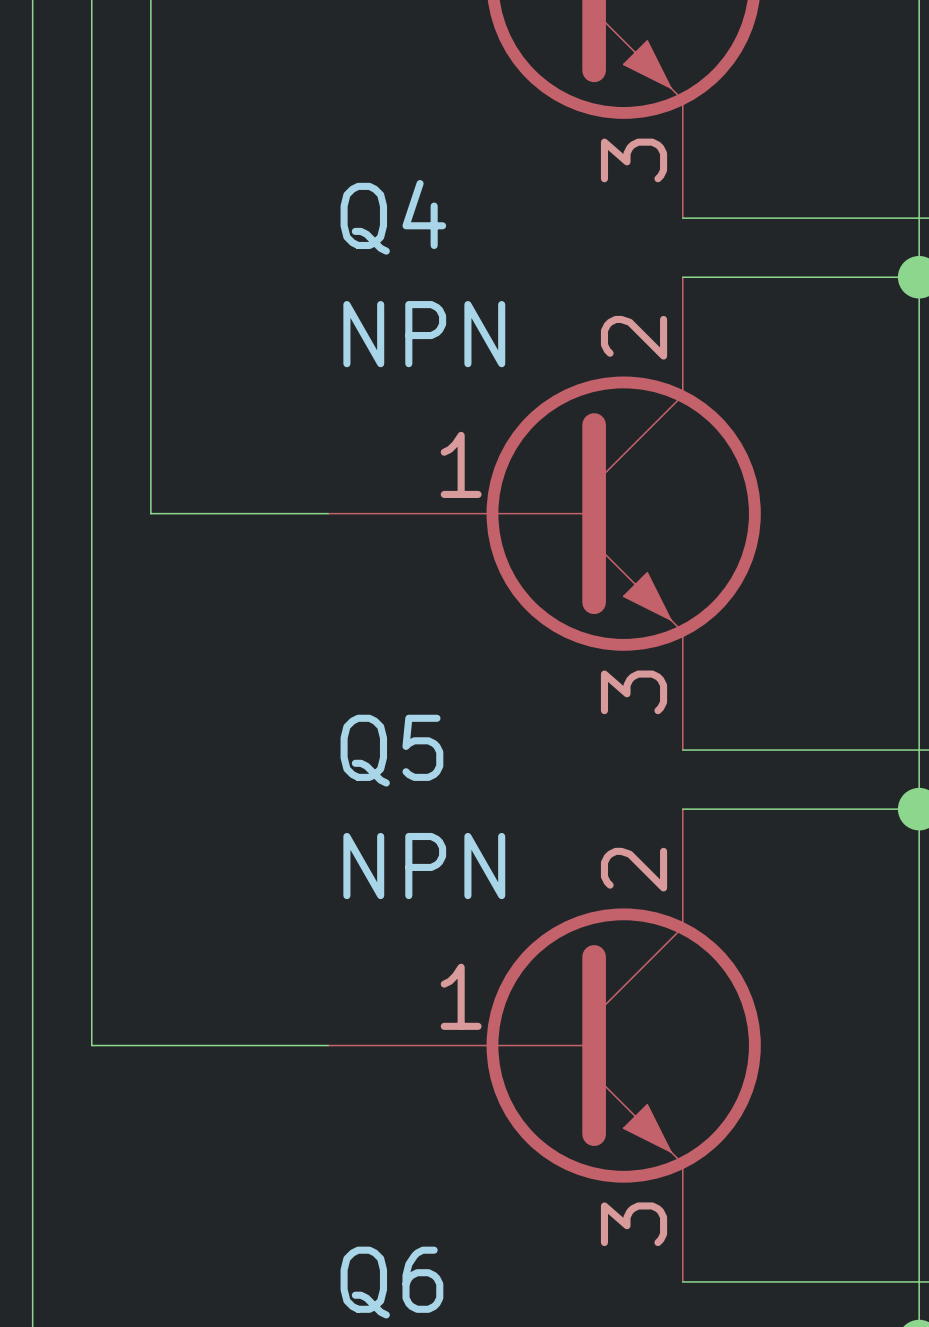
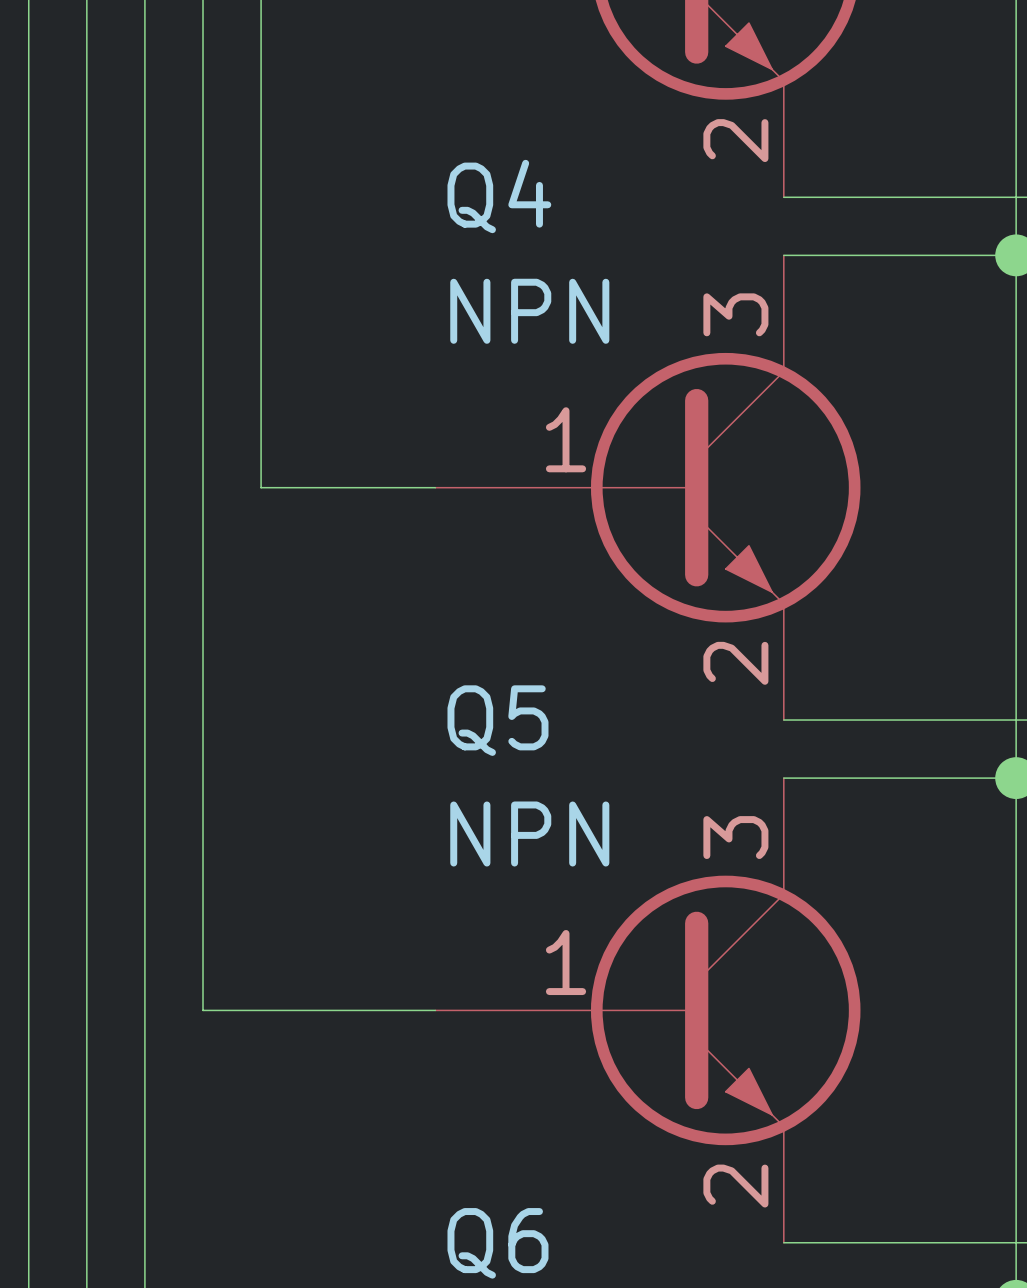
part pin number: 3 (634, 160) -> 2 (735, 140)
Q4 pin number: 2 (634, 337) -> 3 (735, 314)
Q4 pin number: 3 (634, 692) -> 2 (735, 663)
Q5 pin number: 2 (634, 869) -> 3 (735, 837)
Q5 pin number: 3 (634, 1224) -> 2 (735, 1186)

